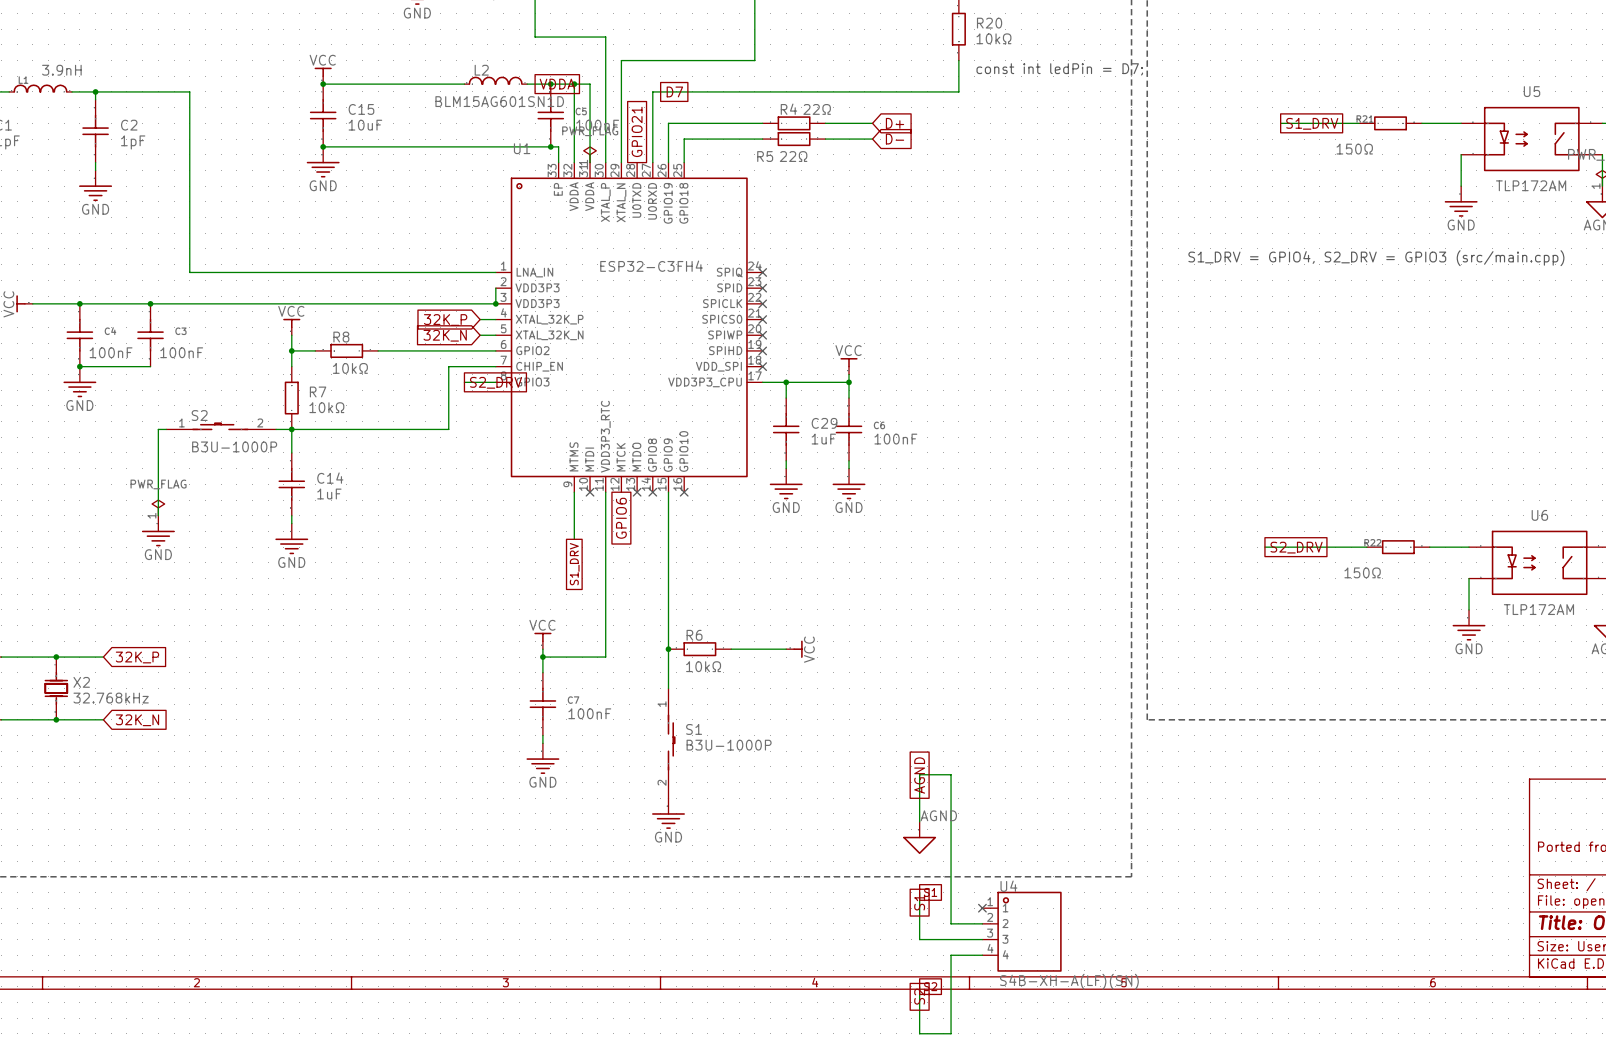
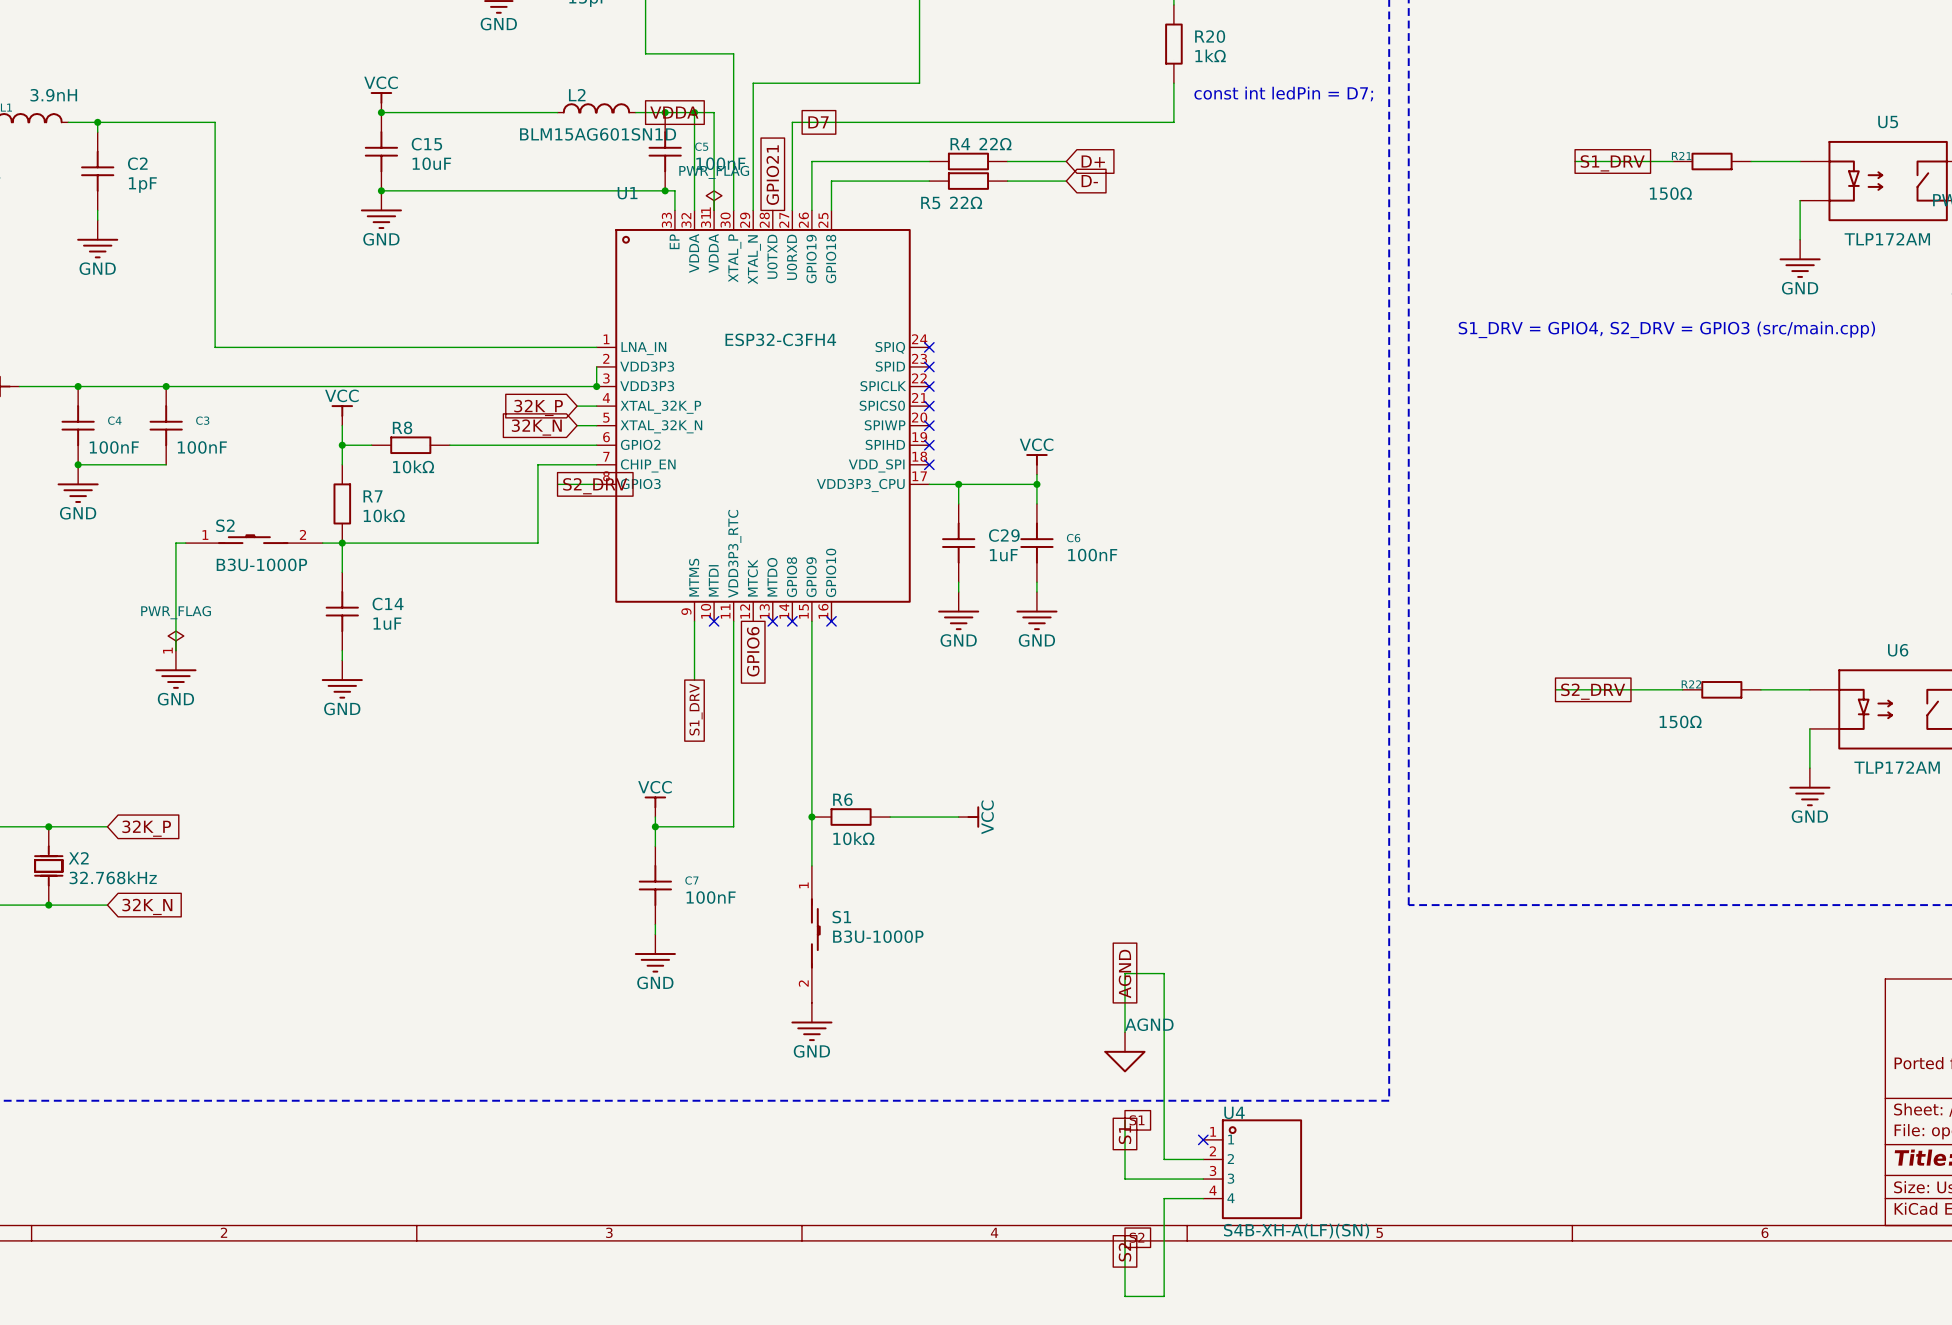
R20 value: 10kΩ (993, 38) -> 1kΩ (1210, 55)

